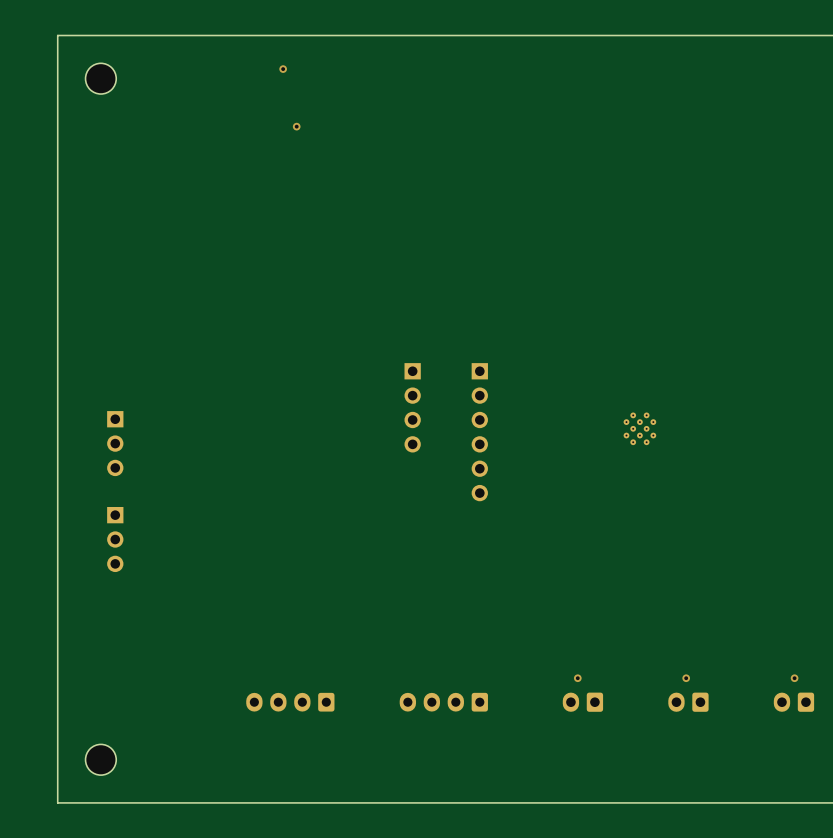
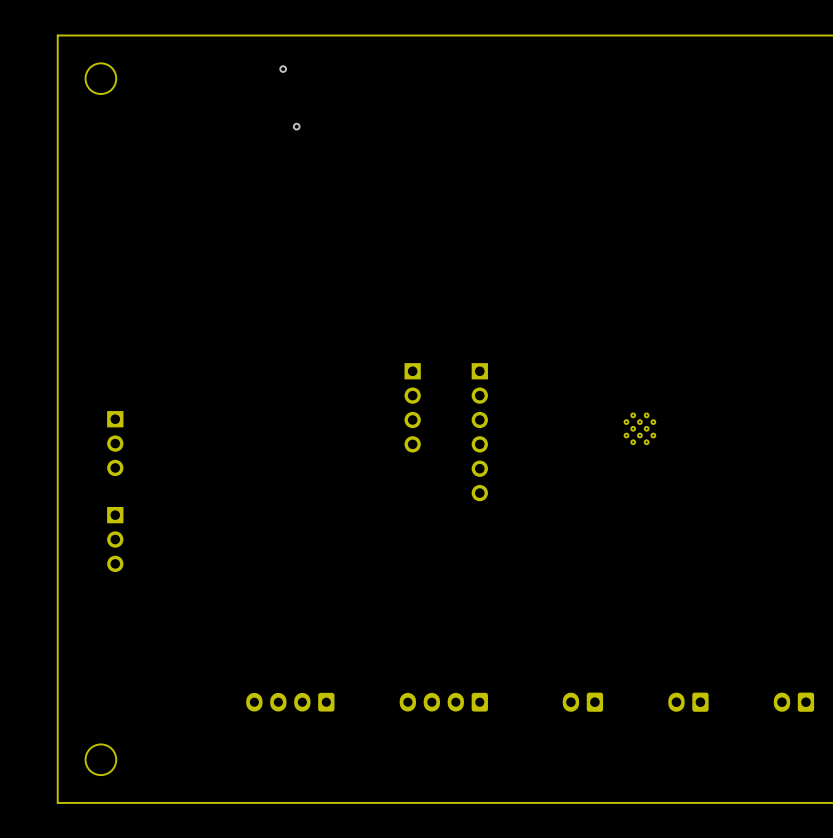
via: (577, 678) -> none
via: (686, 678) -> none
via: (794, 678) -> none

